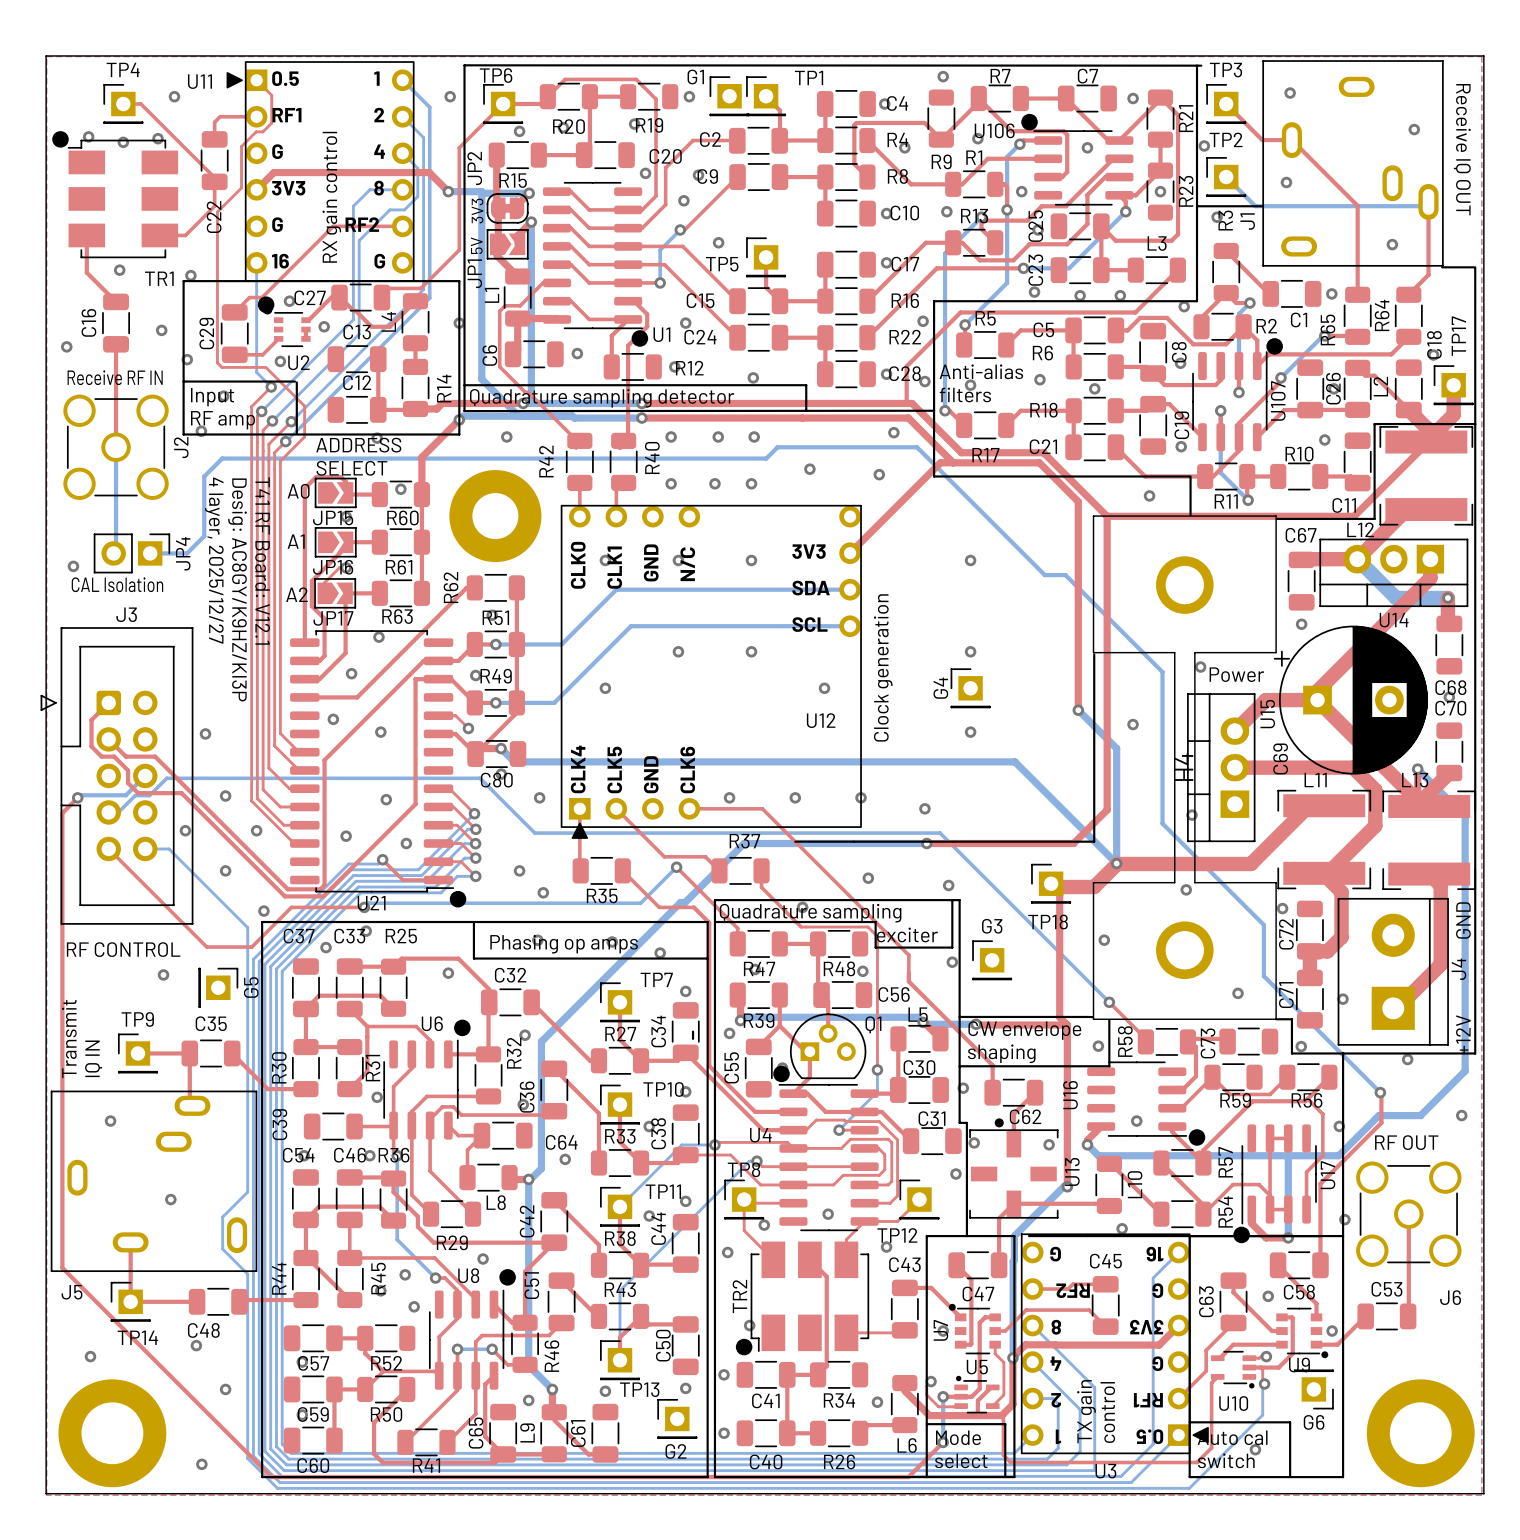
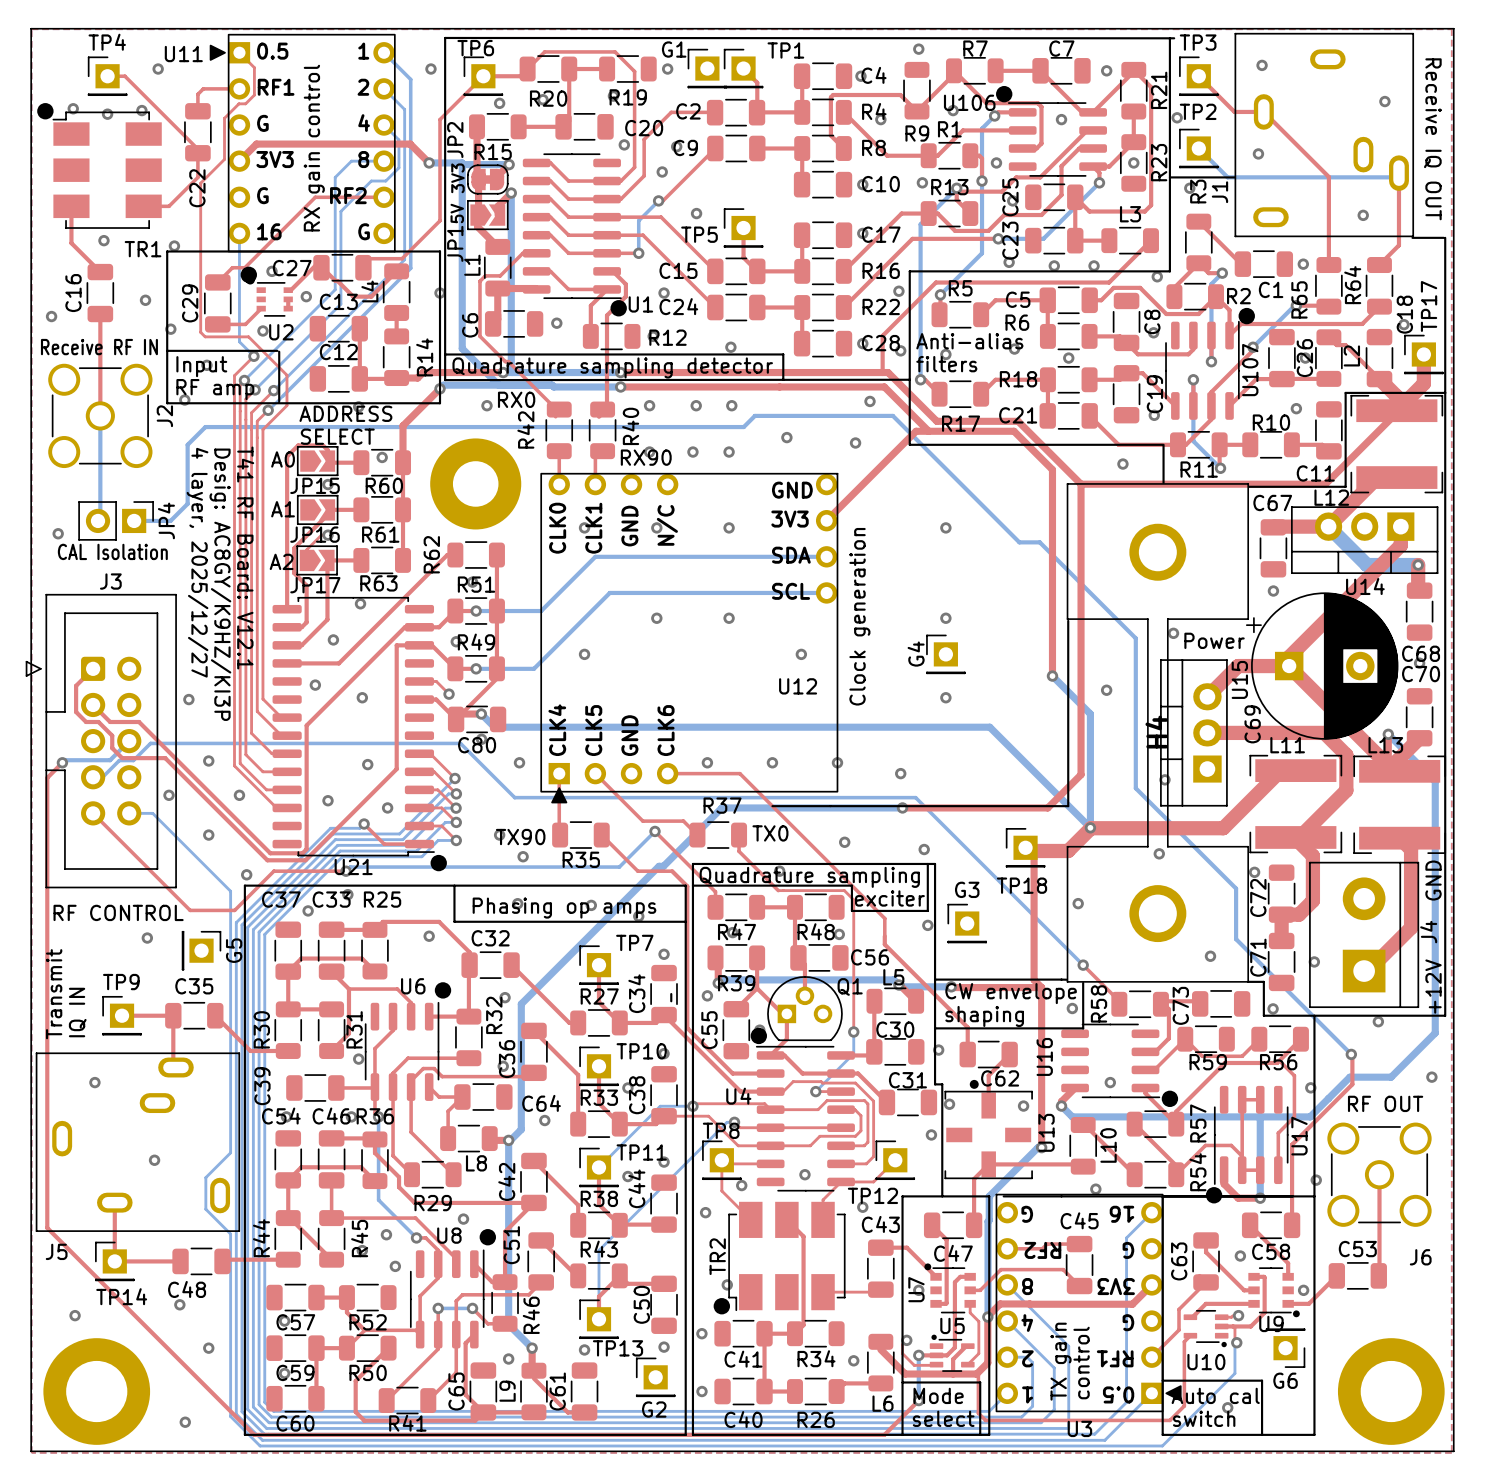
text: none -> RX0 (516, 399)
text: none -> RX90 (646, 457)
U12 text: none -> GND (792, 490)
text: none -> TX0 (770, 833)
text: none -> TX90 (520, 837)

